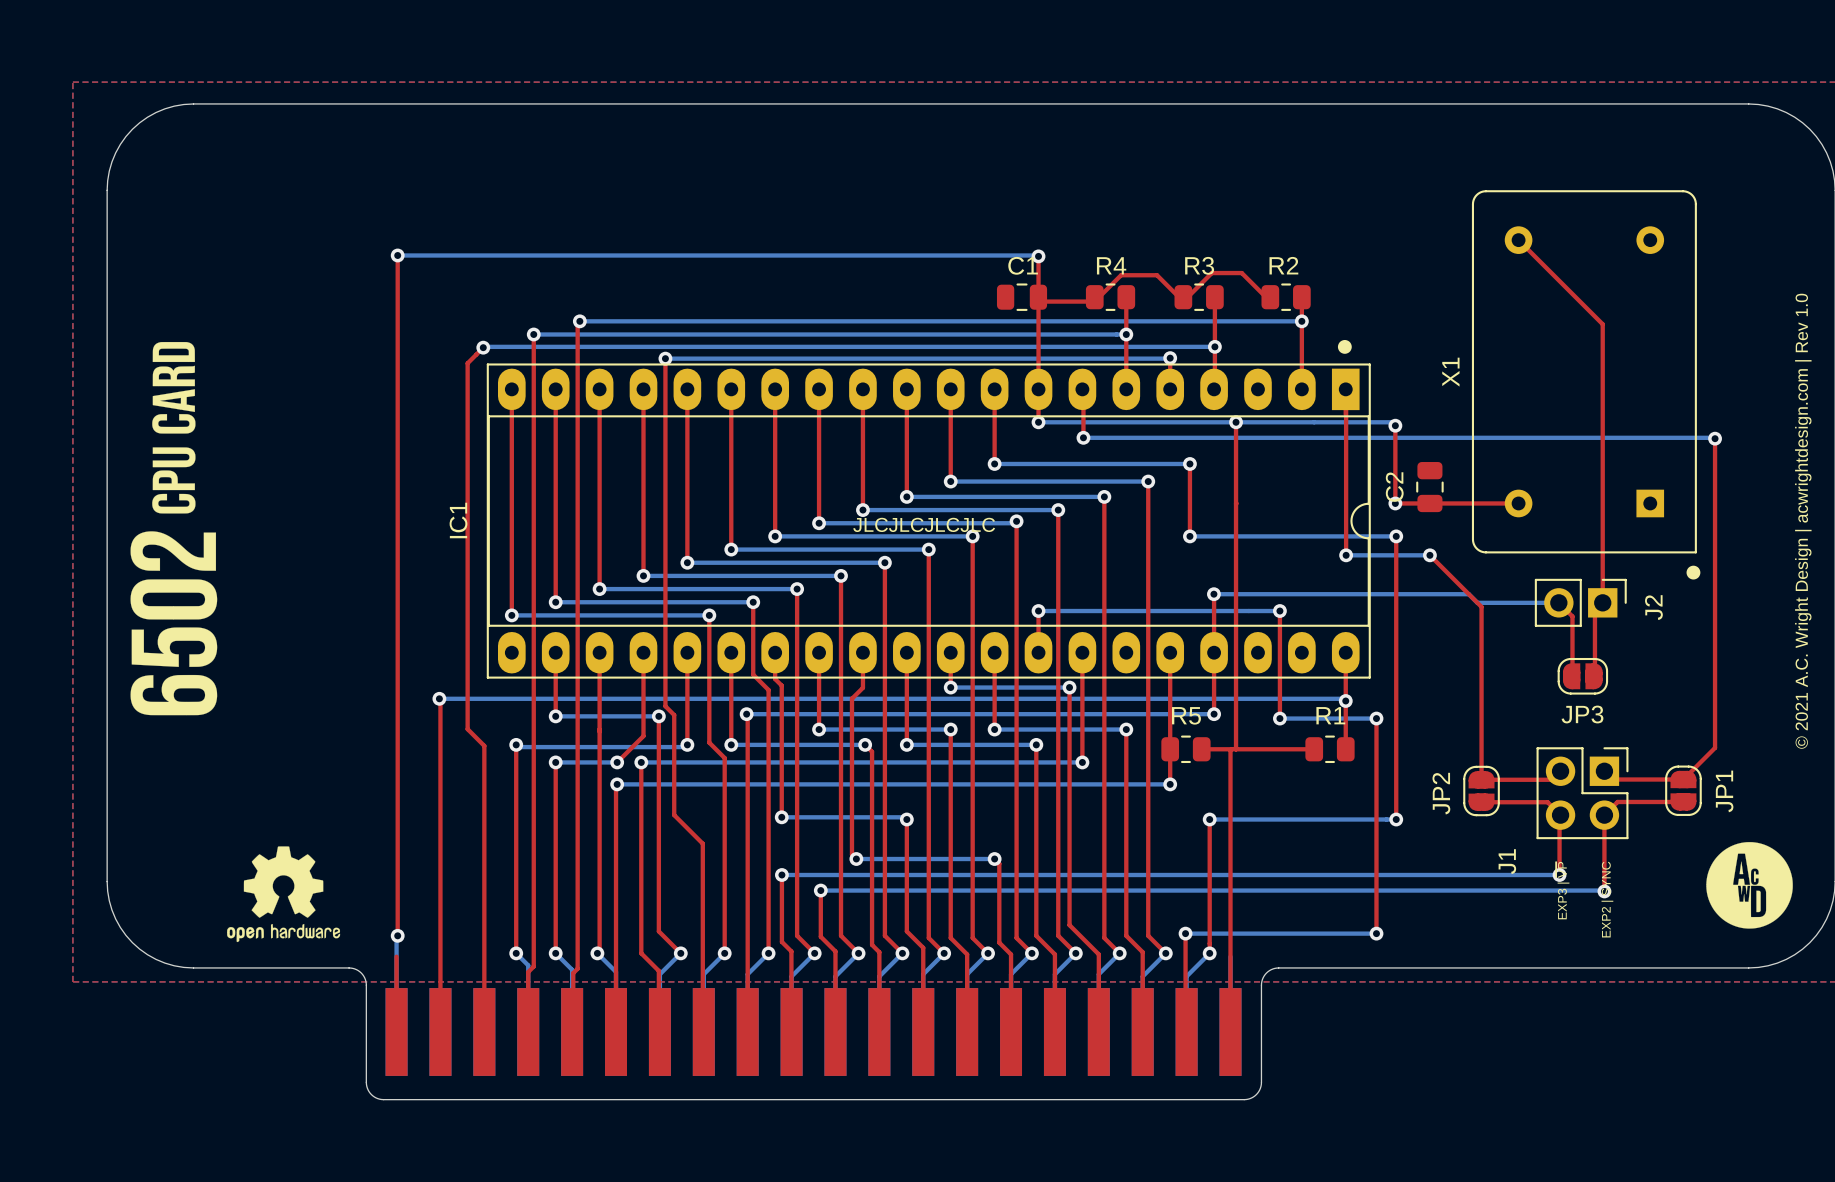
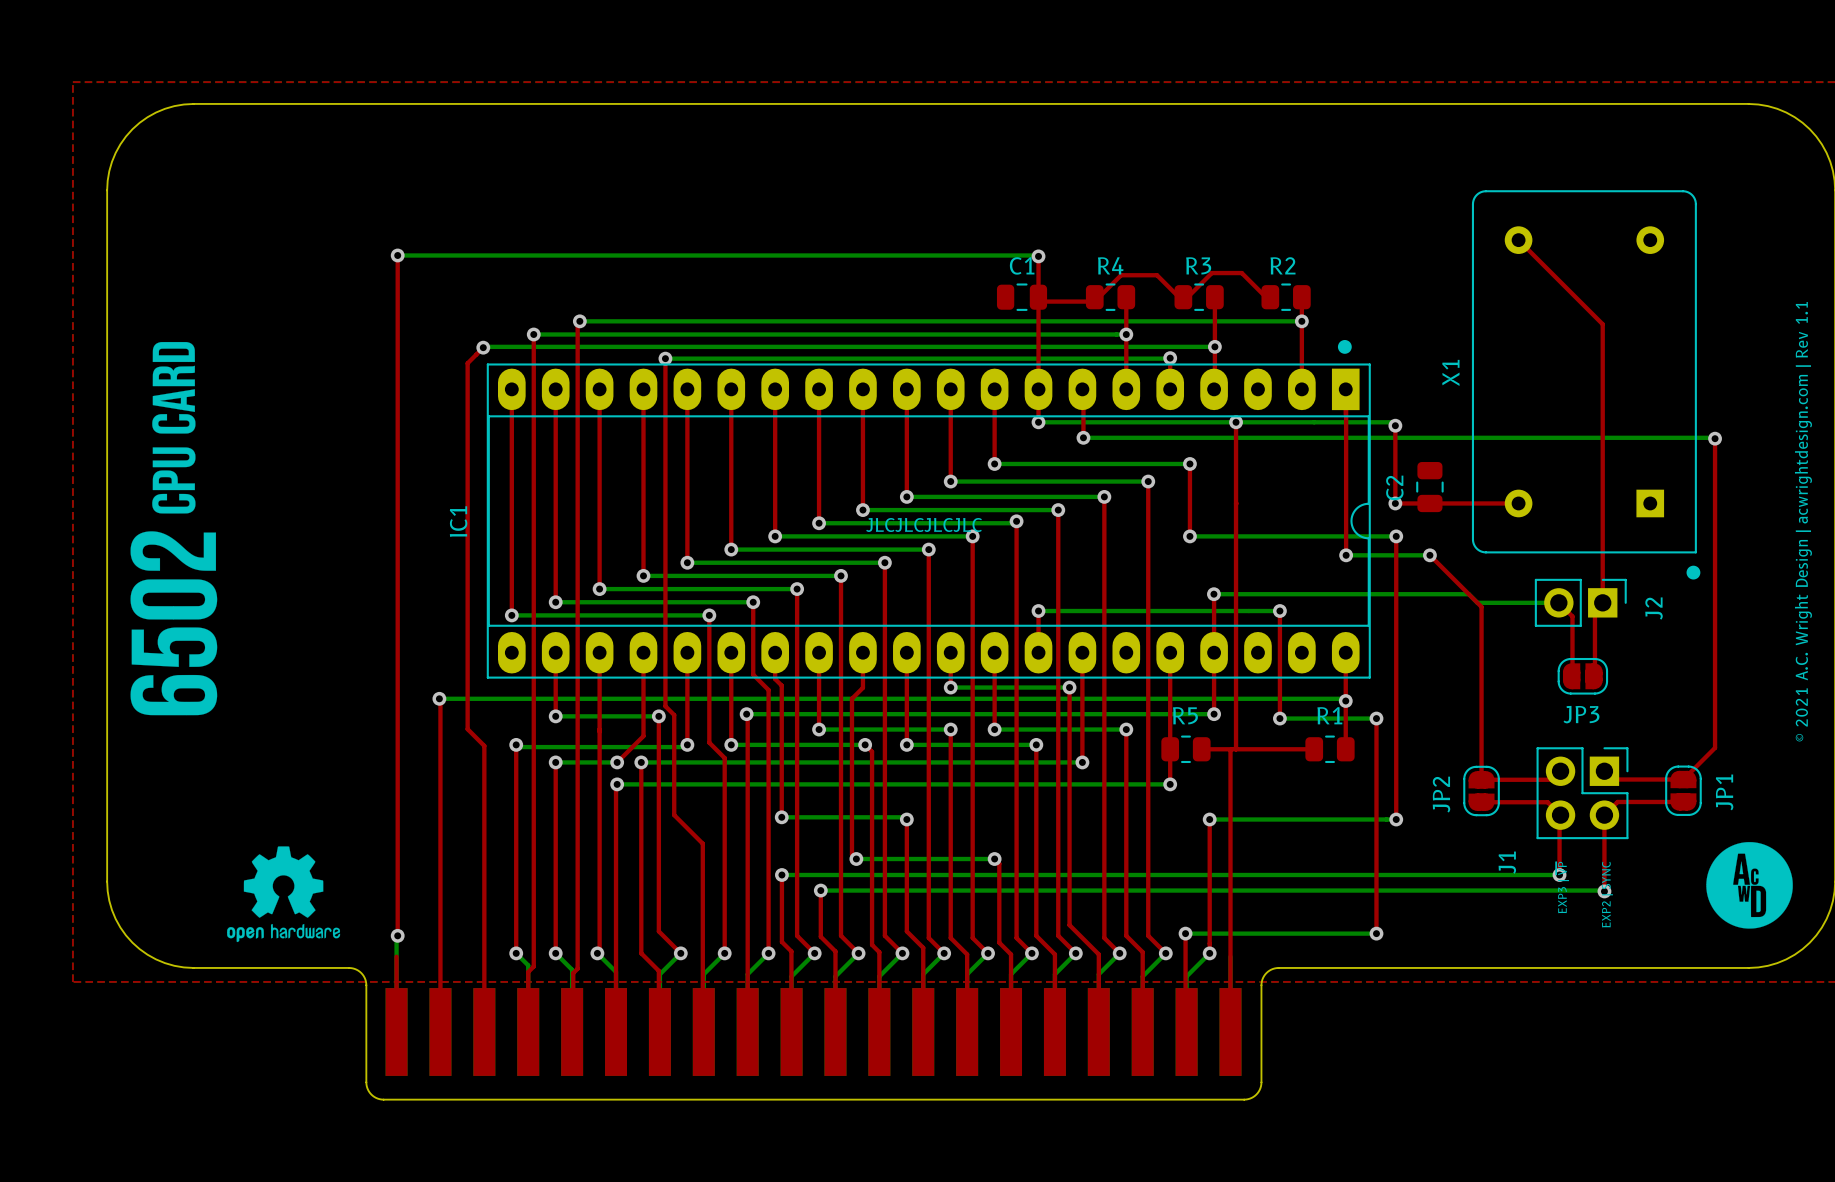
text: © 2021 A.C. Wright Design | acwrightdesign.com | Rev 1.0 (1803, 521) -> © 2021 A.C. Wright Design | acwrightdesign.com | Rev 1.1 (1803, 521)

